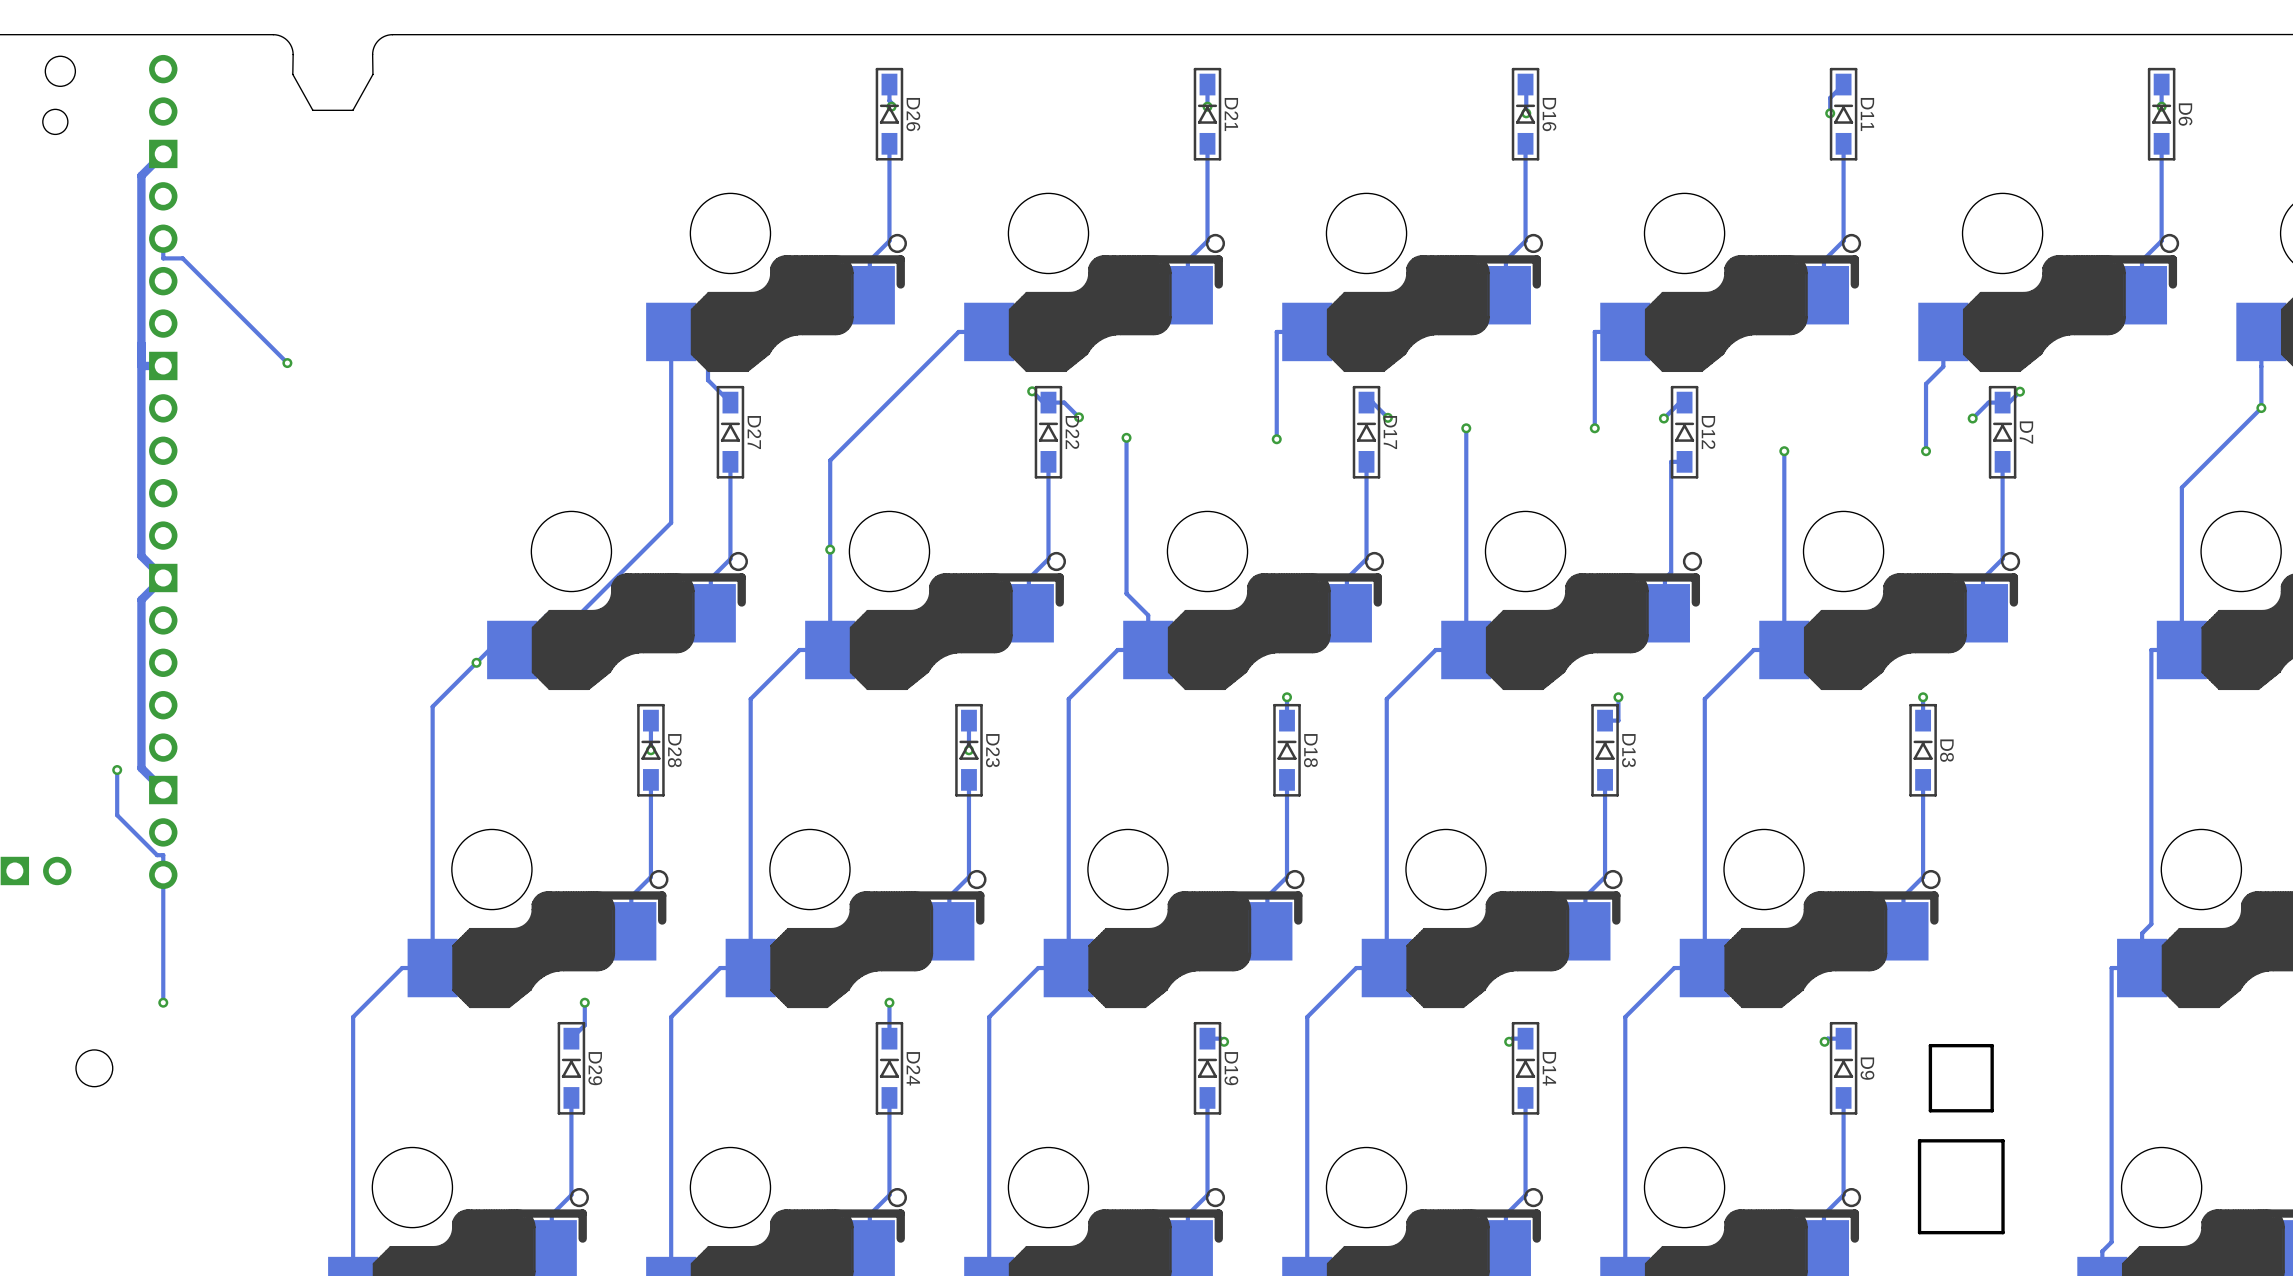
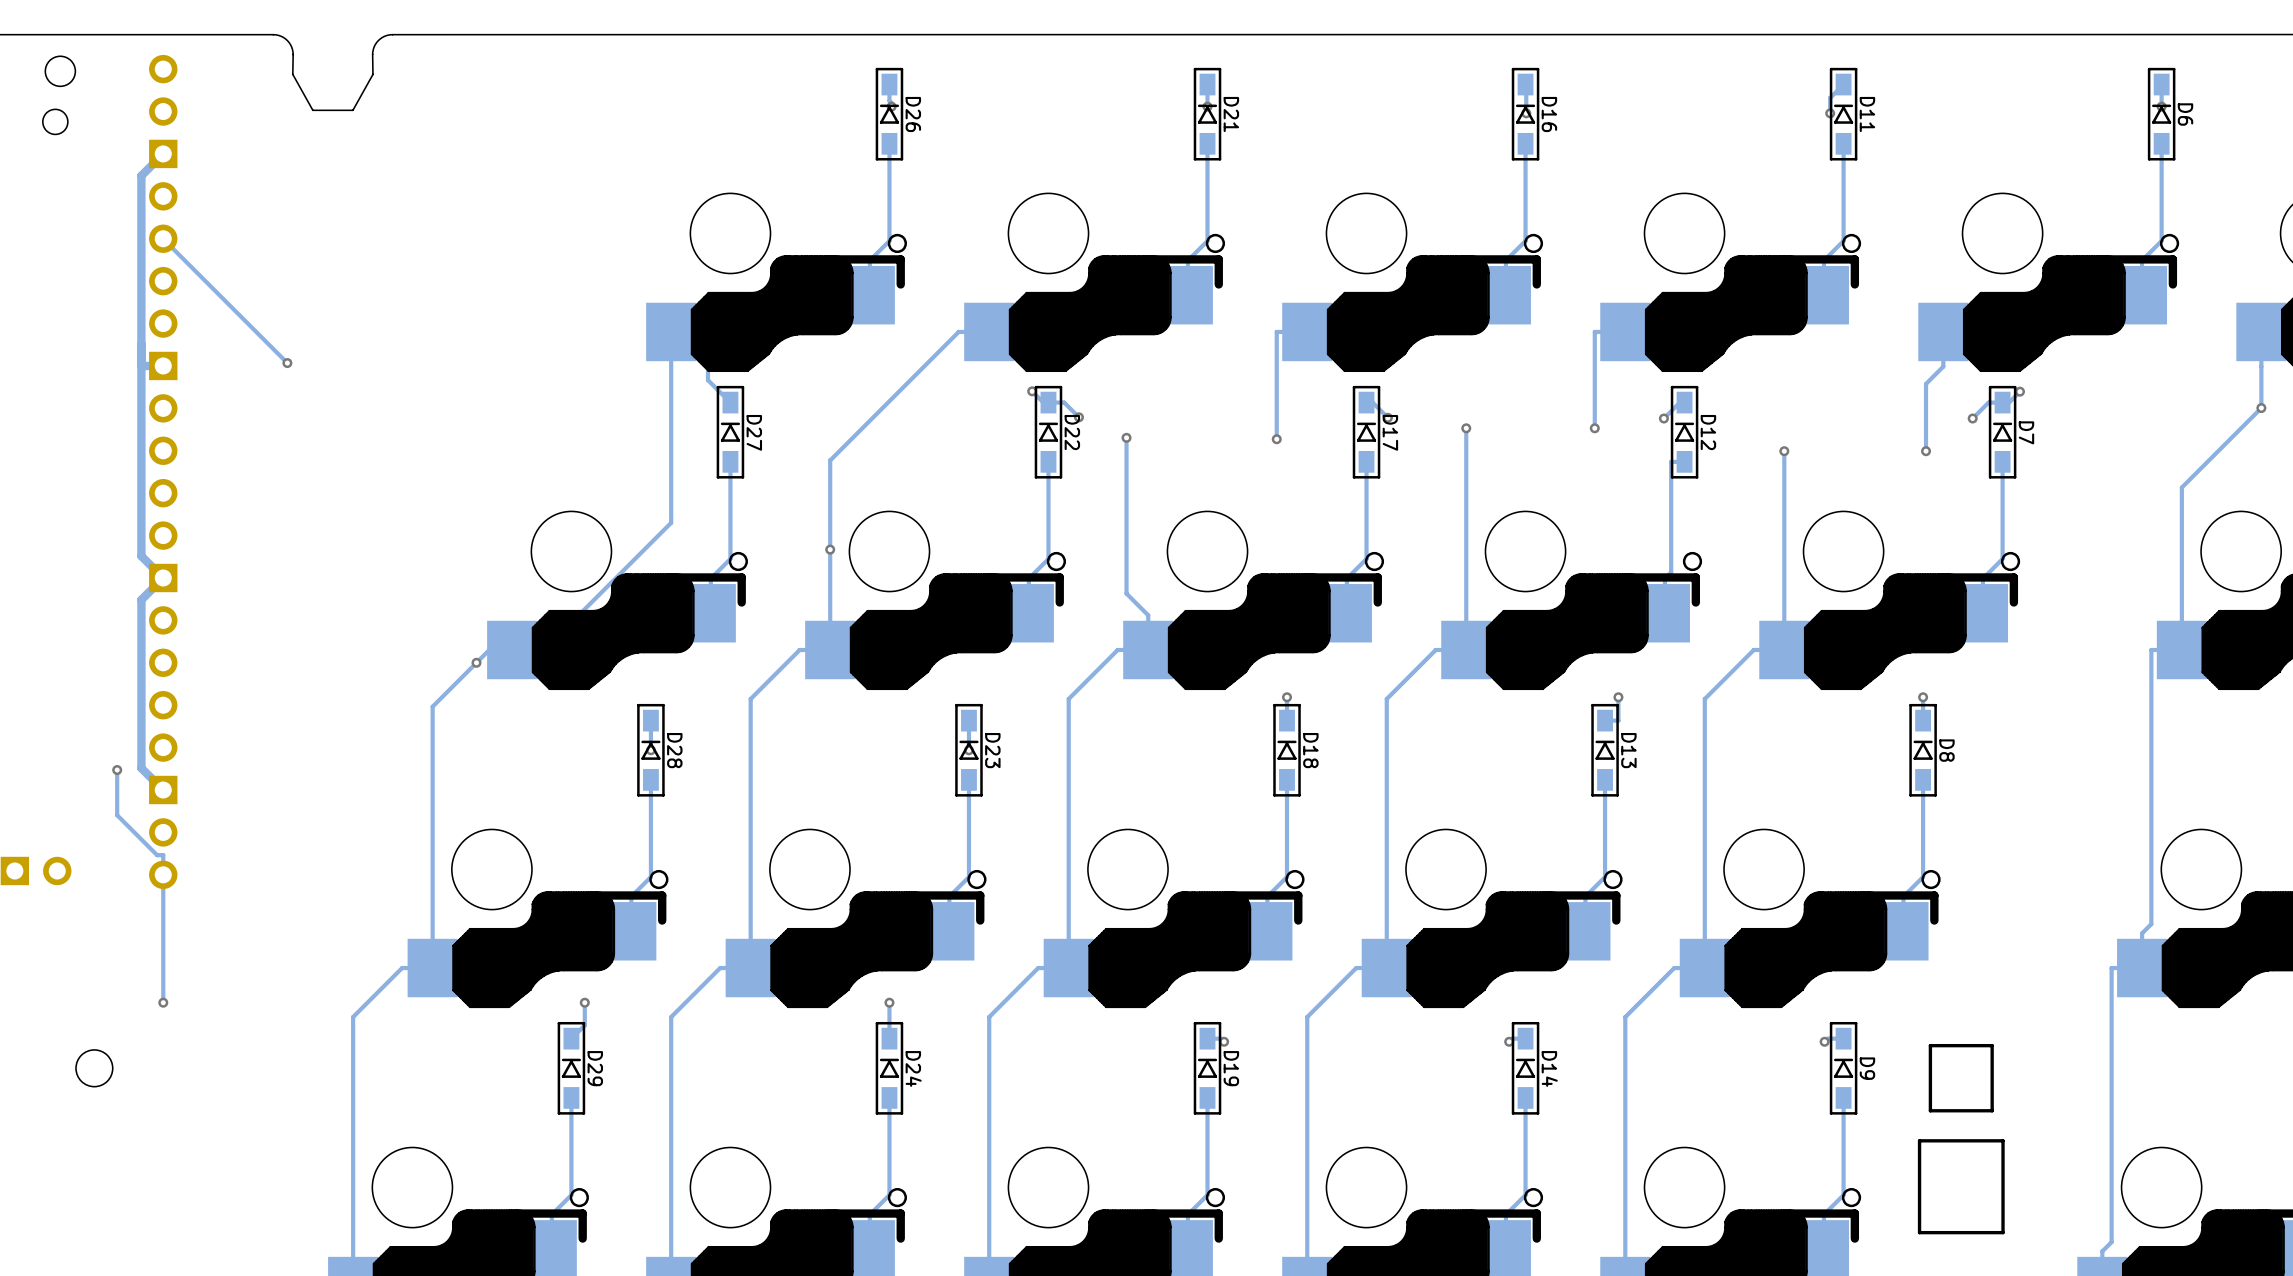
track: (163, 238) (163, 258) (182, 258) -> (163, 238) (182, 258)

